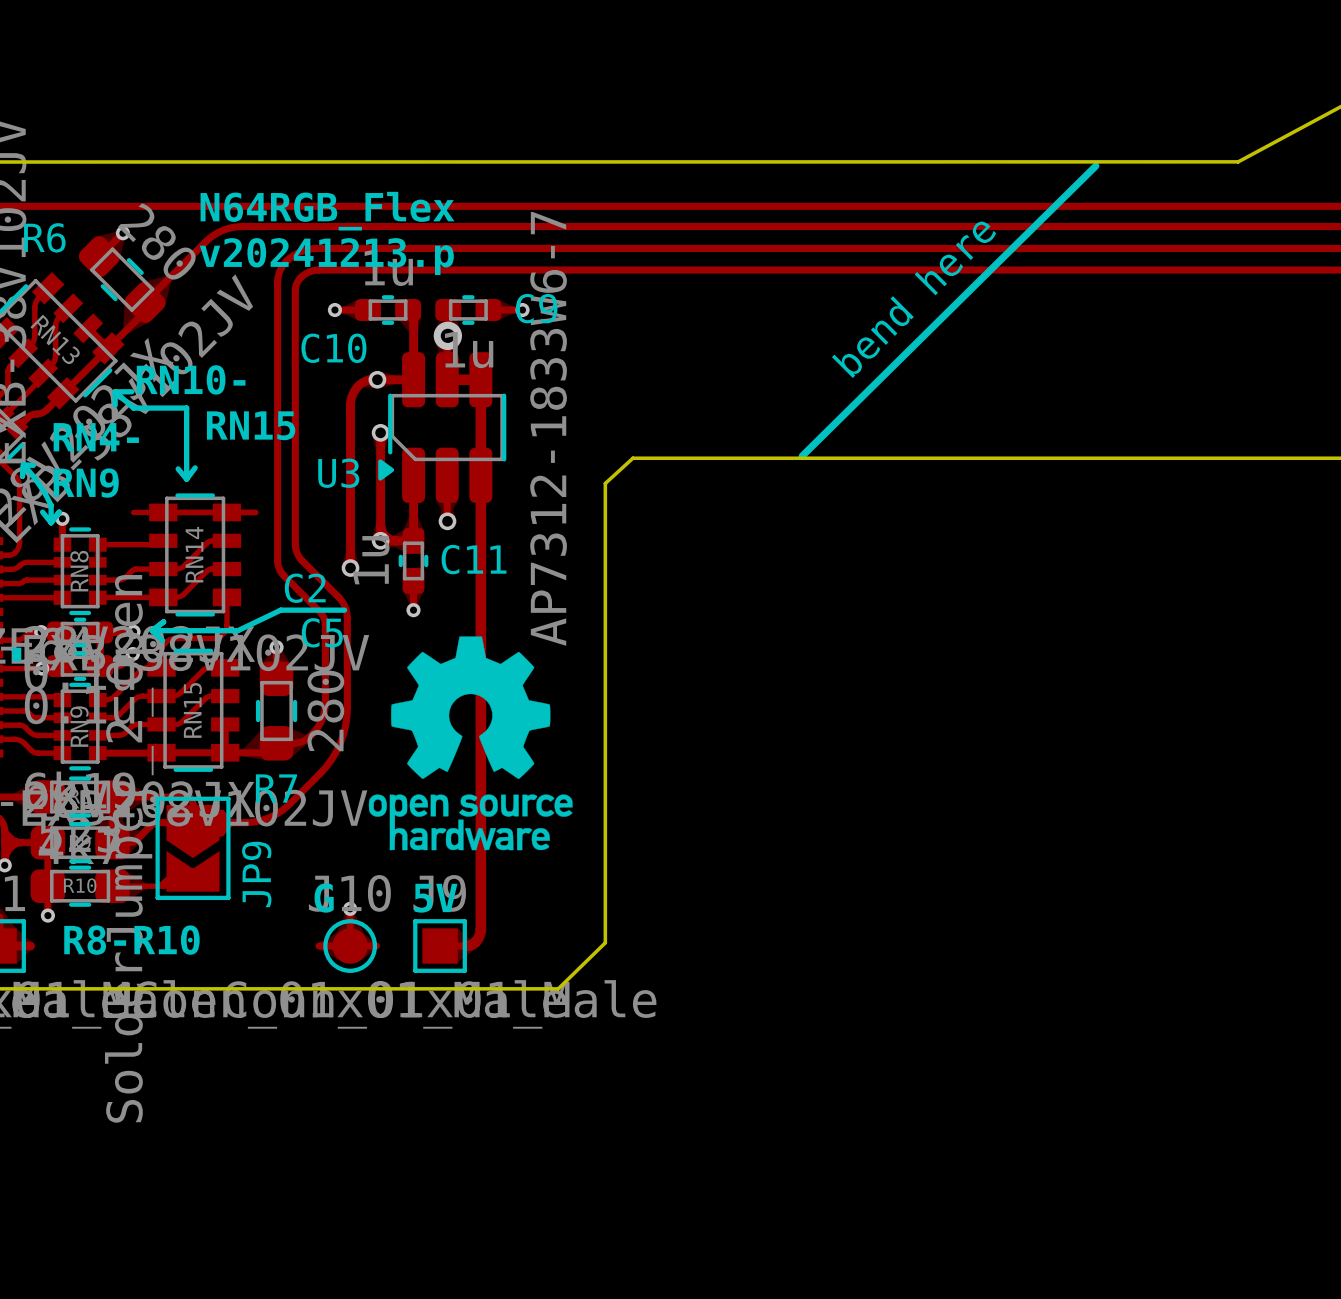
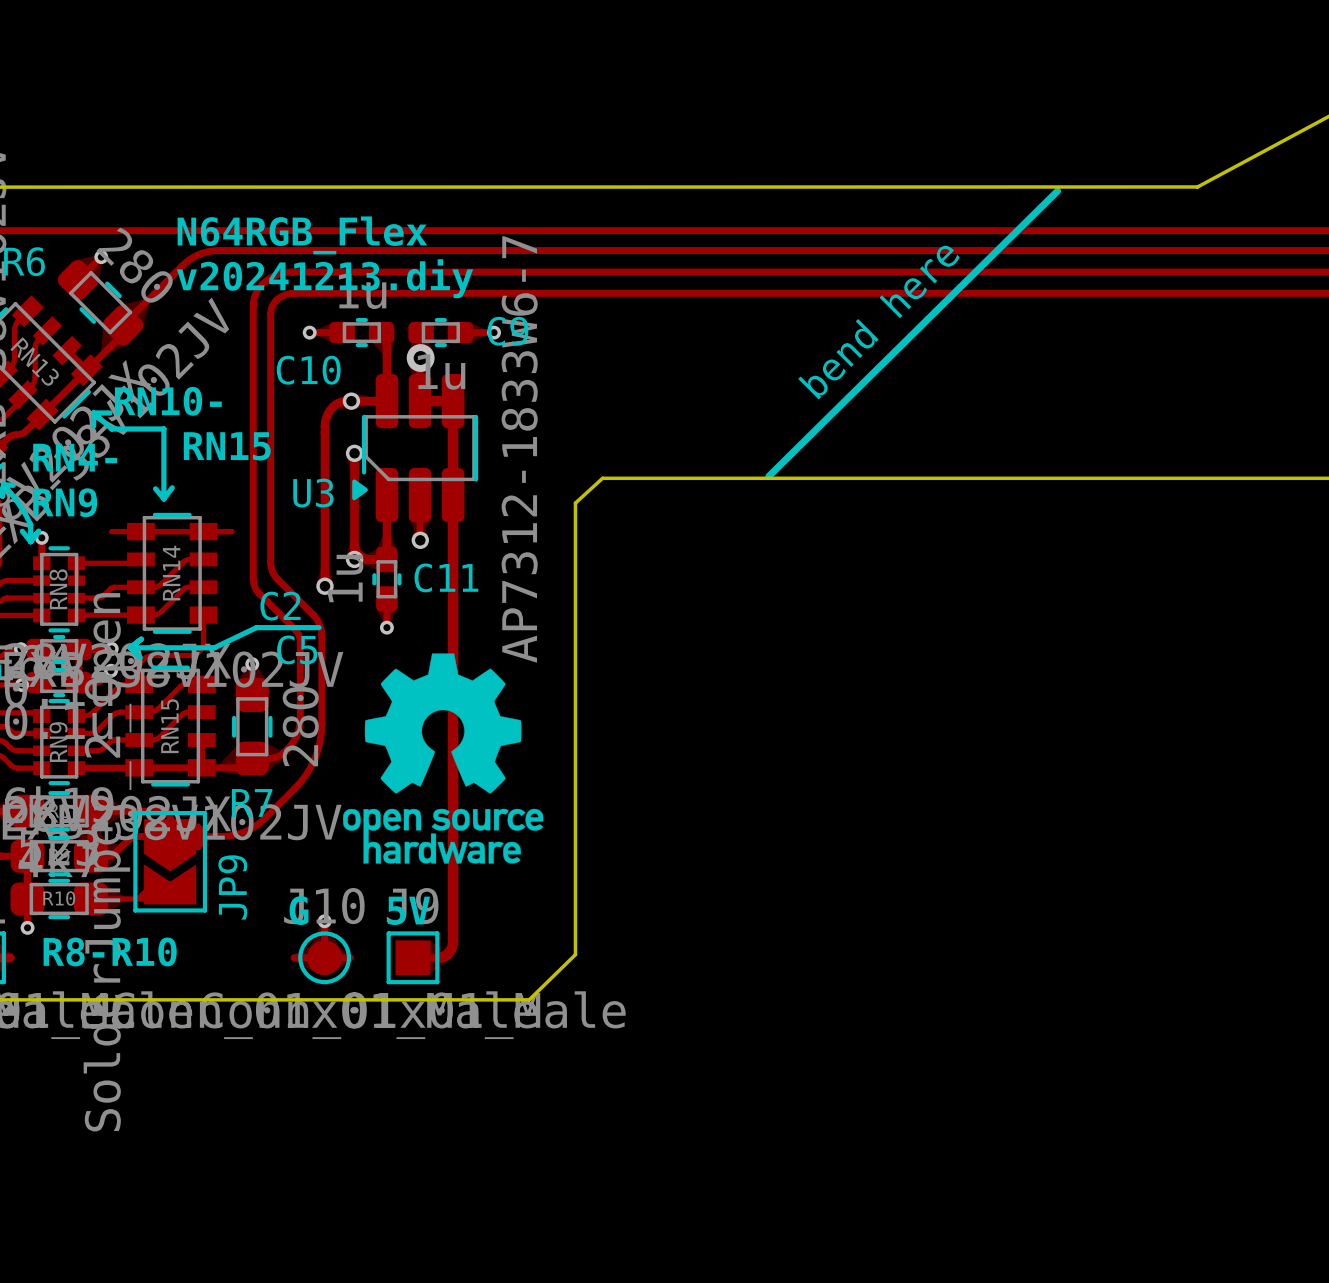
text: v20241213.p (326, 256) -> v20241213.diy (324, 278)

